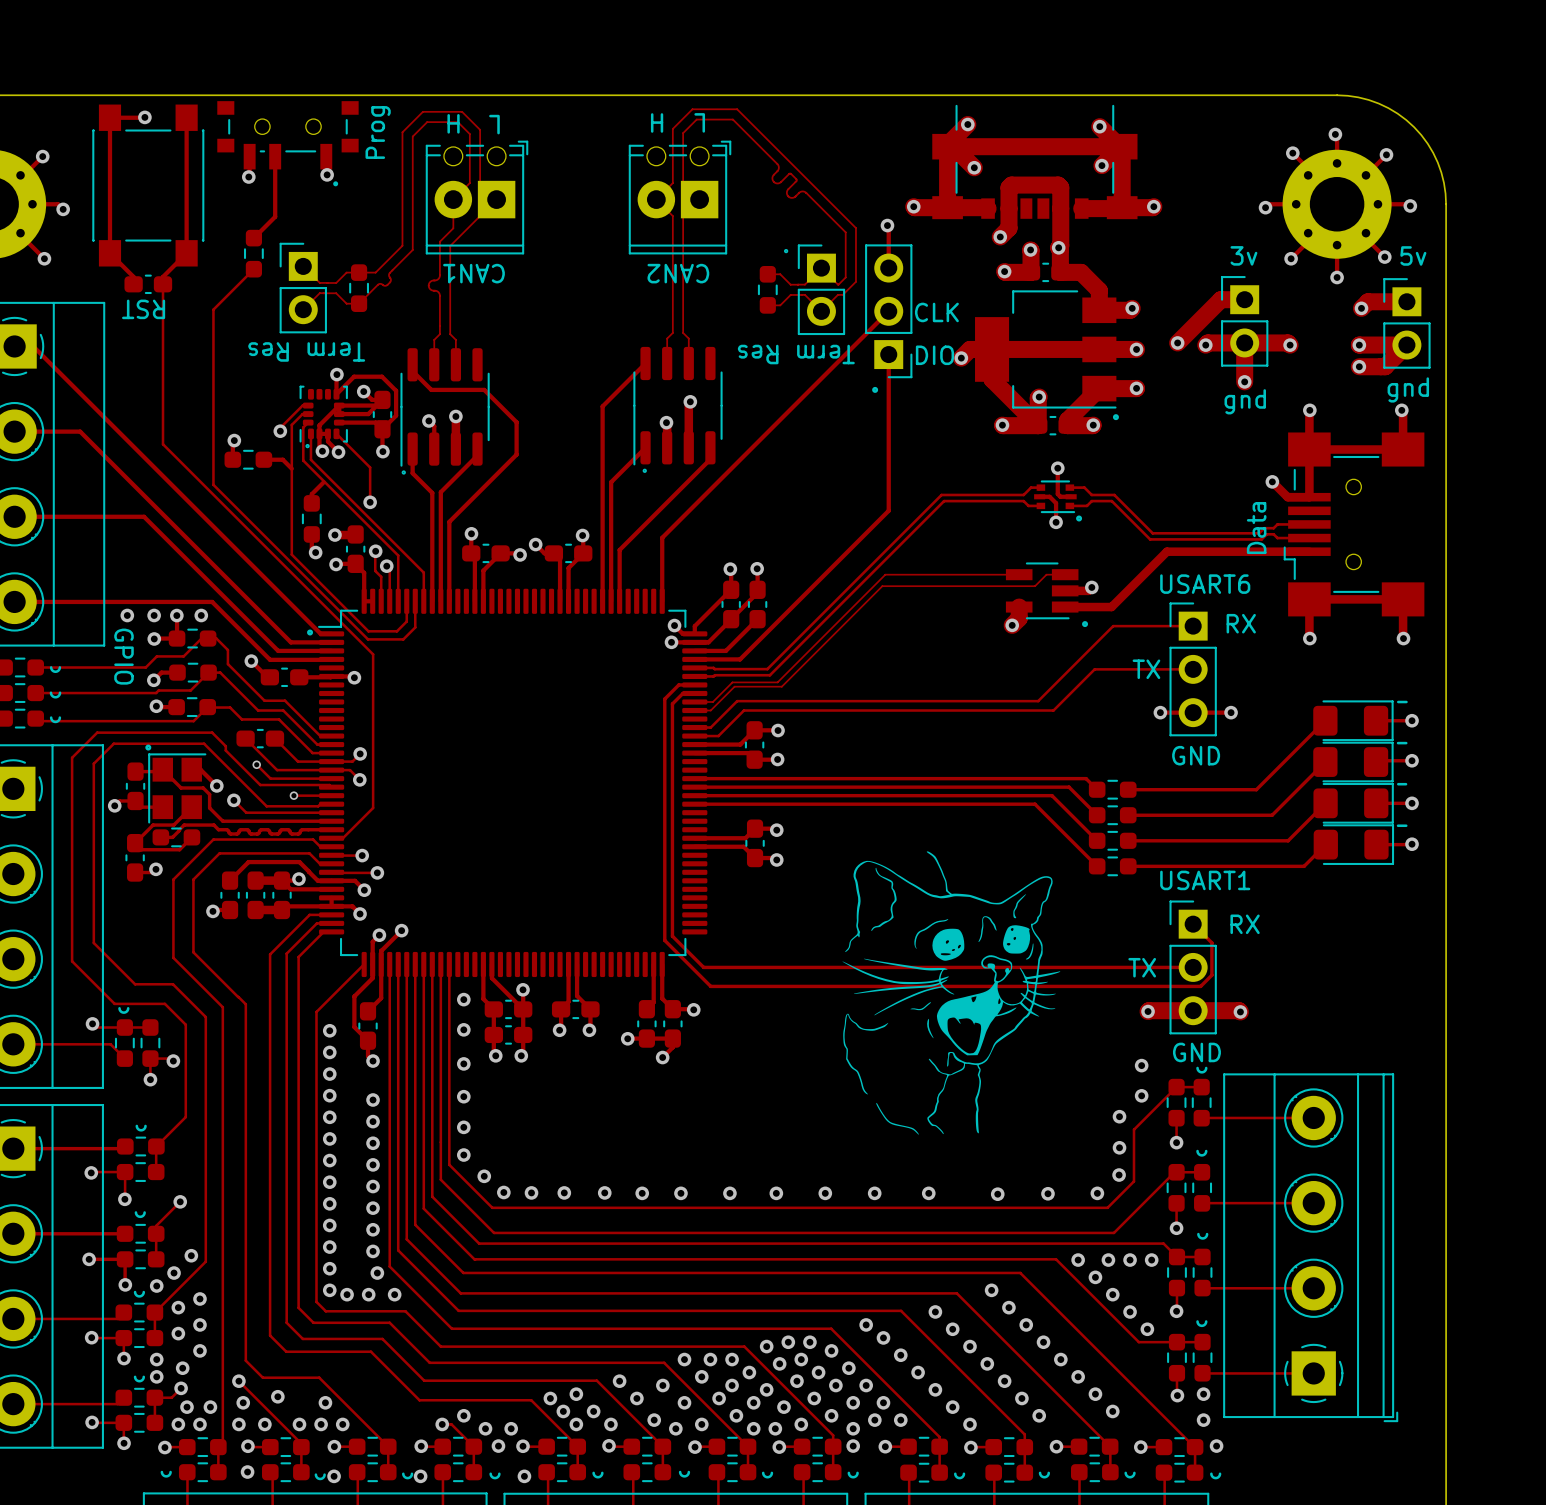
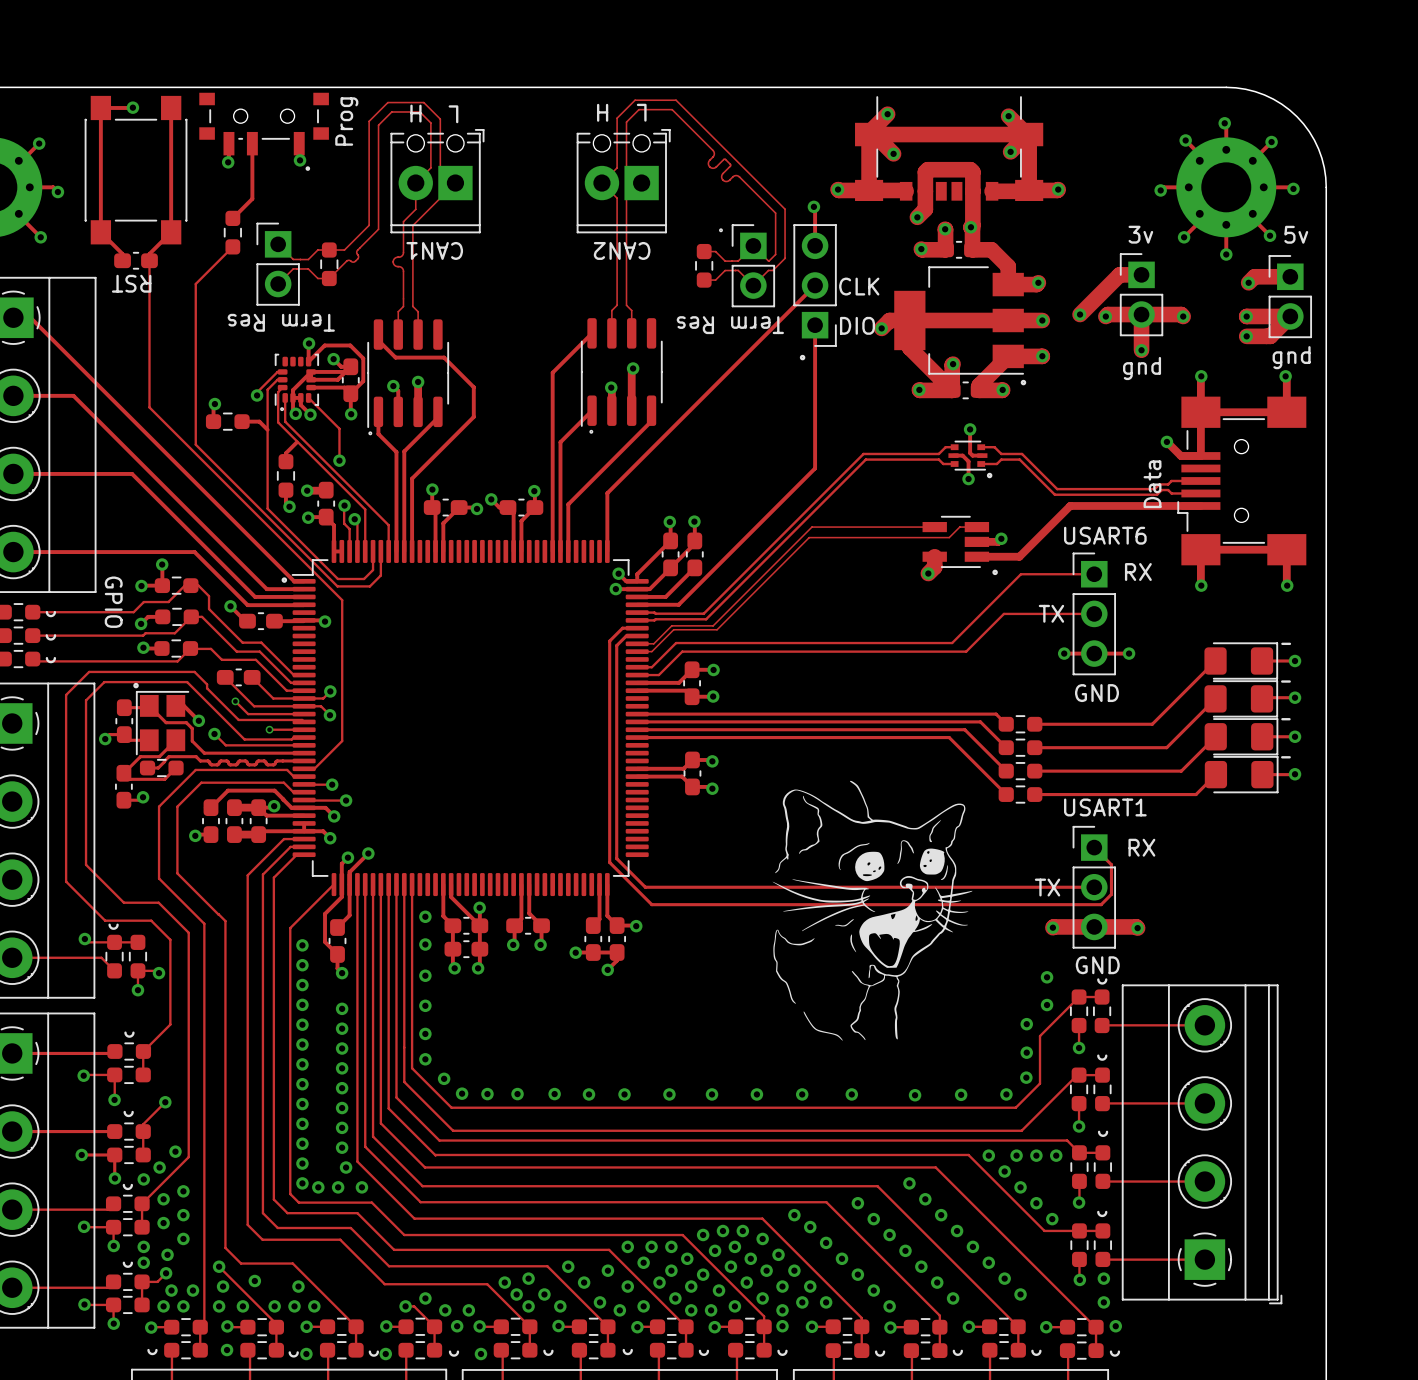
via: (127, 615) -> none
via: (154, 615) -> none
via: (201, 615) -> none

